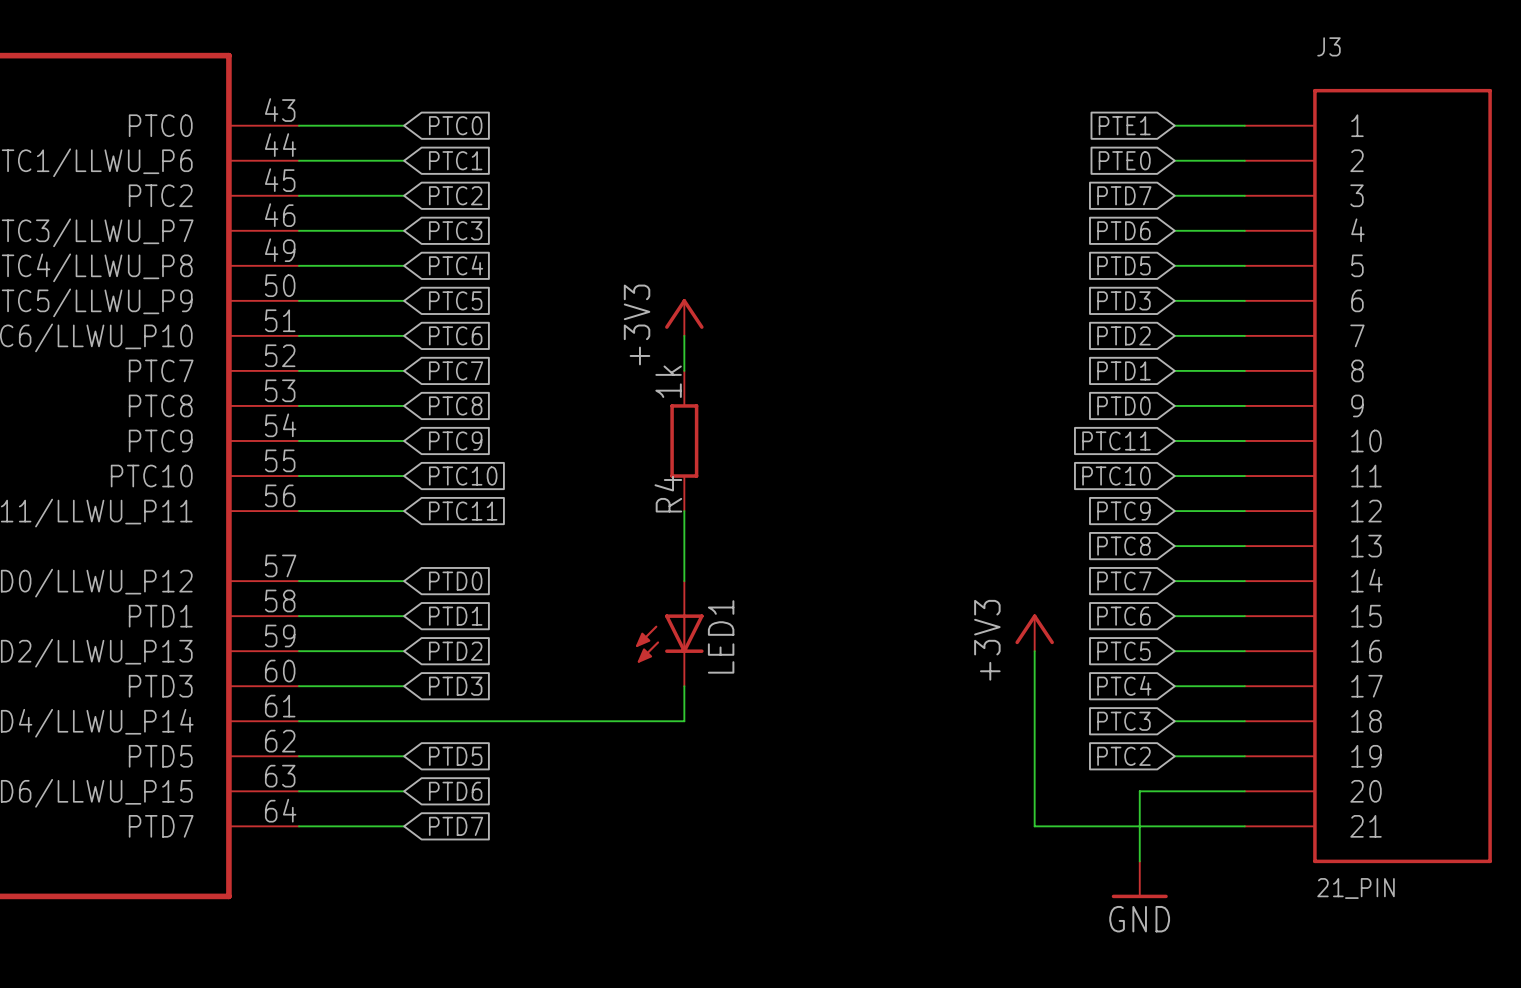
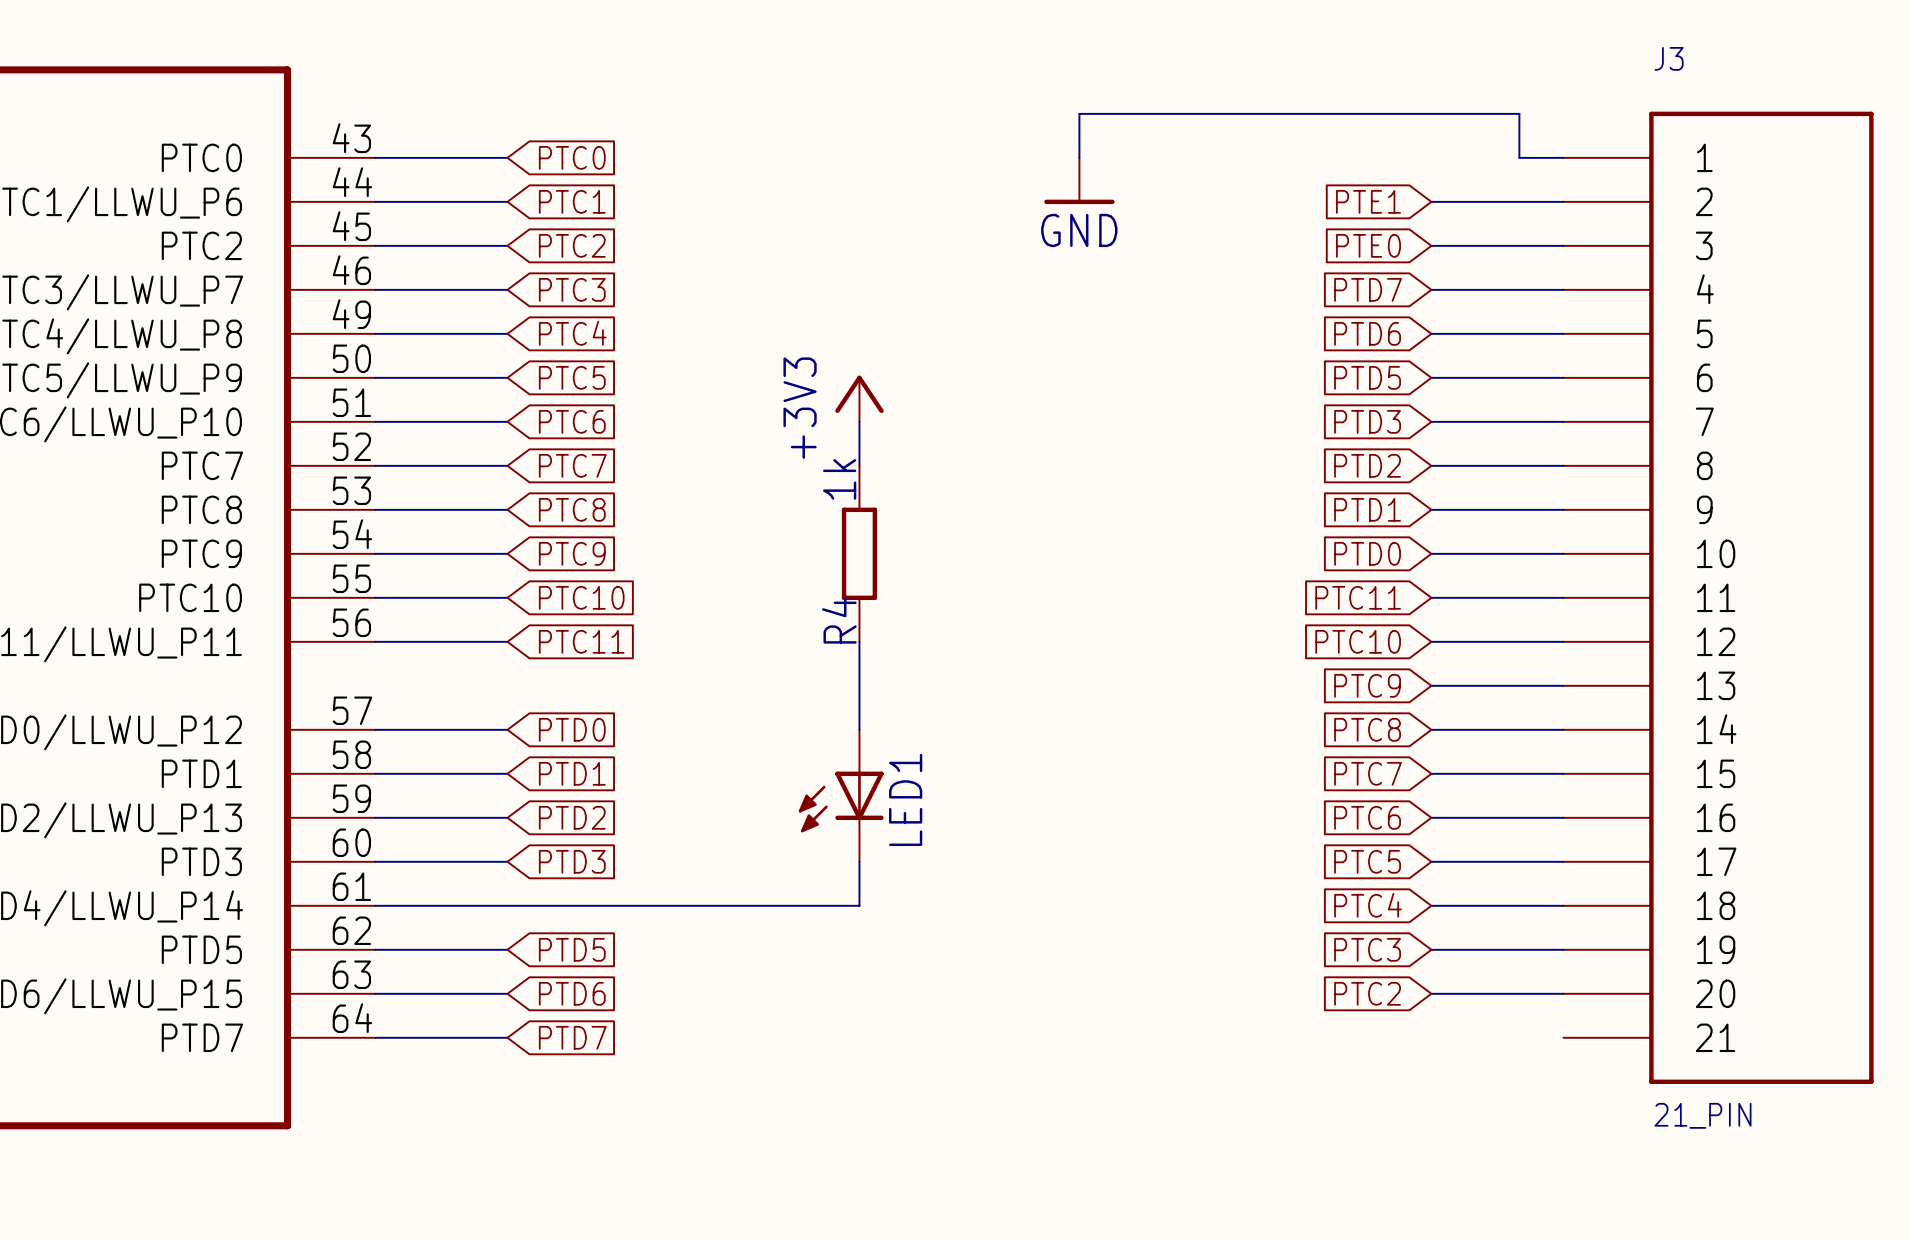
global label position: PTE1 (1124, 125) -> PTE1 (1368, 201)
wire: (1174, 125) (1209, 125) -> (1079, 157) (1079, 113) (1519, 113) (1519, 157)
power symbol: none -> GND (1079, 180)
global label position: PTE0 (1124, 160) -> PTE0 (1368, 245)
wire: none -> (1431, 201) (1475, 201)
global label position: PTD7 (1124, 195) -> PTD7 (1368, 289)
wire: none -> (1431, 245) (1475, 245)
global label position: PTD6 (1123, 230) -> PTD6 (1367, 333)
wire: none -> (1431, 289) (1475, 289)
global label position: PTD5 (1123, 265) -> PTD5 (1367, 377)
wire: none -> (1431, 333) (1475, 333)
global label position: PTD3 (1123, 300) -> PTD3 (1367, 421)
wire: none -> (1431, 377) (1475, 377)
global label position: PTD2 (1123, 335) -> PTD2 (1367, 465)
wire: none -> (1431, 421) (1475, 421)
global label position: PTD1 (1123, 370) -> PTD1 (1367, 509)
wire: none -> (1431, 465) (1475, 465)
global label position: PTD0 (1123, 405) -> PTD0 (1367, 553)
wire: none -> (1431, 509) (1475, 509)
global label position: PTC11 (1116, 440) -> PTC11 (1358, 597)
wire: none -> (1431, 553) (1475, 553)
global label position: PTC10 (1116, 476) -> PTC10 (1358, 641)
wire: none -> (1431, 597) (1475, 597)
global label position: PTC9 (1123, 511) -> PTC9 (1367, 685)
wire: none -> (1431, 641) (1475, 641)
global label position: PTC8 (1123, 546) -> PTC8 (1367, 729)
wire: none -> (1431, 685) (1475, 685)
global label position: PTC7 (1124, 581) -> PTC7 (1368, 773)
wire: none -> (1431, 729) (1475, 729)
global label position: PTC6 (1123, 616) -> PTC6 (1367, 817)
wire: none -> (1431, 773) (1475, 773)
power symbol: +3V3 (1034, 632) -> none
wire: (1034, 651) (1034, 826) (1244, 826) -> none
global label position: PTC5 (1123, 651) -> PTC5 (1367, 861)
wire: none -> (1431, 817) (1475, 817)
global label position: PTC4 (1124, 685) -> PTC4 (1368, 905)
wire: none -> (1431, 861) (1475, 861)
global label position: PTC3 (1123, 721) -> PTC3 (1367, 949)
wire: none -> (1431, 905) (1475, 905)
global label position: PTC2 (1123, 756) -> PTC2 (1367, 993)
wire: none -> (1431, 949) (1475, 949)
wire: (1139, 791) (1139, 861) -> none
power symbol: GND (1139, 879) -> none

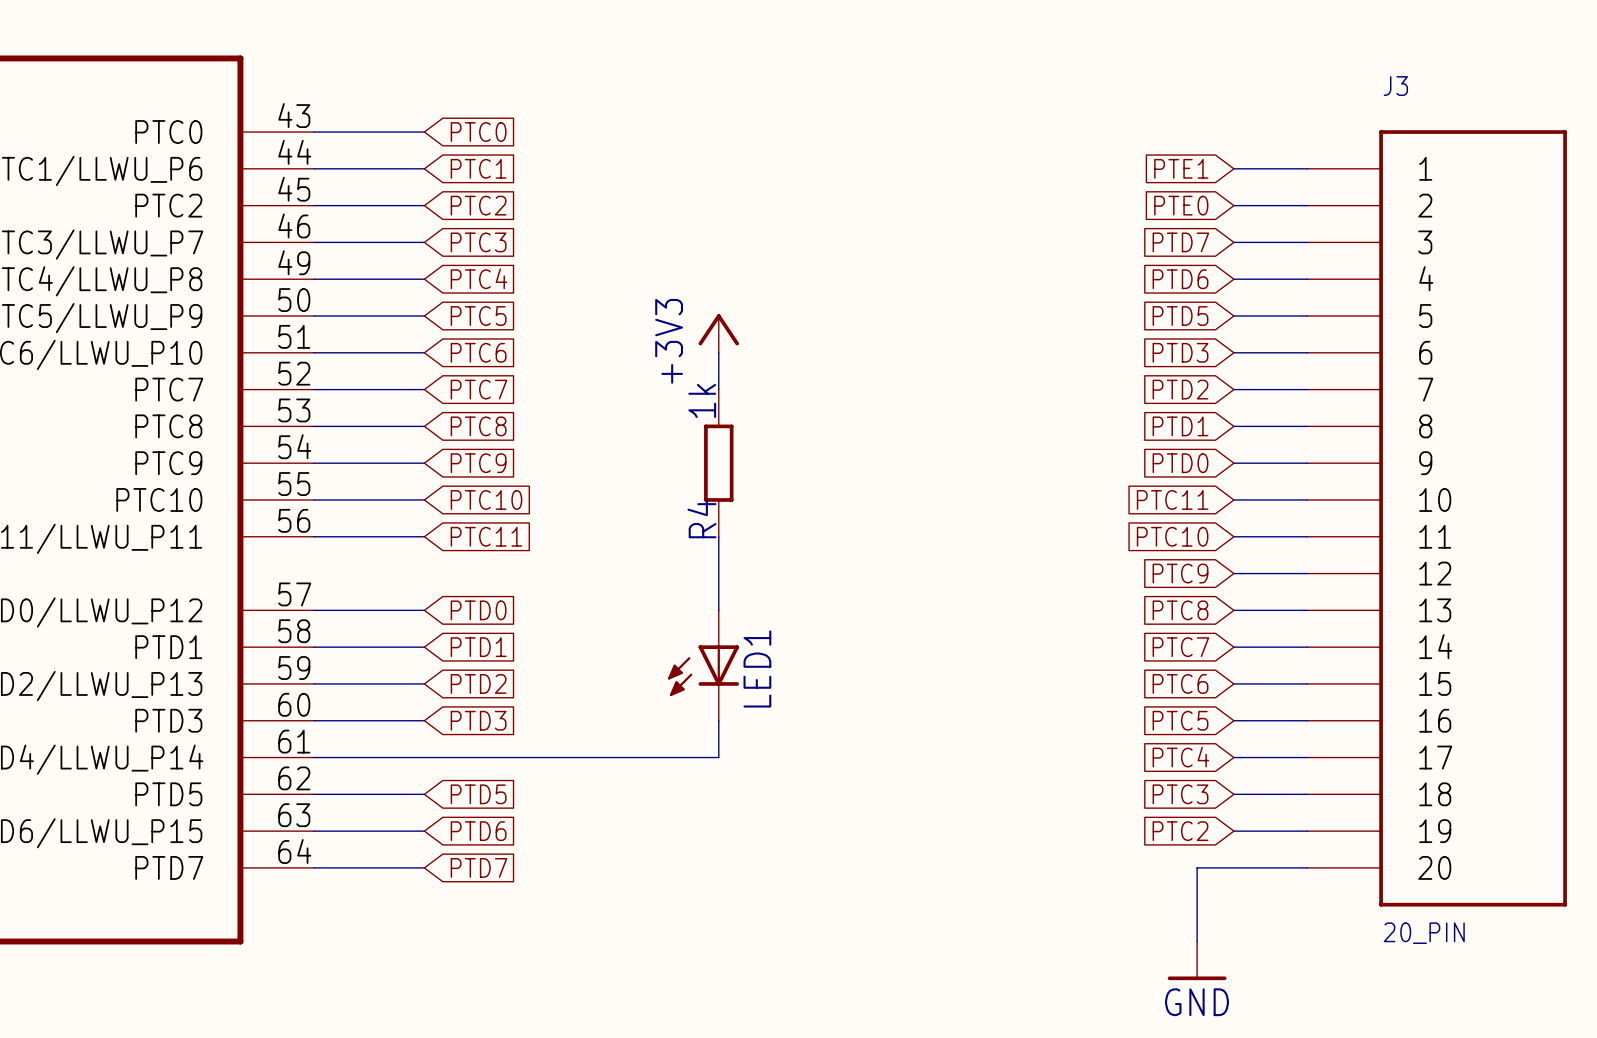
J3 symbol: [1563, 111, 1874, 1084] -> [1307, 130, 1567, 907]
wire: (1079, 157) (1079, 113) (1519, 113) (1519, 157) (1563, 157) -> none
power symbol: GND (1079, 180) -> none
global label position: PTE1 (1368, 201) -> PTE1 (1181, 168)
wire: (1431, 201) (1475, 201) -> none
global label position: PTE0 (1368, 245) -> PTE0 (1181, 205)
wire: (1431, 245) (1475, 245) -> none
global label position: PTD7 (1368, 289) -> PTD7 (1180, 242)
wire: (1431, 289) (1475, 289) -> none
global label position: PTD6 (1367, 333) -> PTD6 (1180, 279)
wire: (1431, 333) (1475, 333) -> none
global label position: PTD5 (1367, 377) -> PTD5 (1180, 316)
wire: (1431, 377) (1475, 377) -> none
global label position: PTD3 (1367, 421) -> PTD3 (1180, 352)
wire: (1431, 421) (1475, 421) -> none
global label position: PTD2 (1367, 465) -> PTD2 (1180, 389)
wire: (1431, 465) (1475, 465) -> none
global label position: PTD1 (1367, 509) -> PTD1 (1180, 426)
wire: (1431, 509) (1475, 509) -> none
global label position: PTD0 (1367, 553) -> PTD0 (1180, 463)
wire: (1431, 553) (1475, 553) -> none
global label position: PTC11 (1358, 597) -> PTC11 (1172, 499)
wire: (1431, 597) (1475, 597) -> none
global label position: PTC10 (1358, 641) -> PTC10 (1172, 536)
wire: (1431, 641) (1475, 641) -> none
global label position: PTC9 (1367, 685) -> PTC9 (1180, 573)
wire: (1431, 685) (1475, 685) -> none
global label position: PTC8 (1367, 729) -> PTC8 (1180, 610)
wire: (1431, 729) (1475, 729) -> none
global label position: PTC7 (1368, 773) -> PTC7 (1180, 647)
wire: (1431, 773) (1475, 773) -> none
global label position: PTC6 (1367, 817) -> PTC6 (1180, 683)
wire: (1431, 817) (1475, 817) -> none
global label position: PTC5 (1367, 861) -> PTC5 (1180, 720)
wire: (1431, 861) (1475, 861) -> none
global label position: PTC4 (1368, 905) -> PTC4 (1180, 757)
wire: (1431, 905) (1475, 905) -> none
global label position: PTC3 (1367, 949) -> PTC3 (1180, 794)
wire: (1431, 949) (1475, 949) -> none
global label position: PTC2 (1367, 993) -> PTC2 (1180, 831)
wire: (1431, 993) (1475, 993) -> none
wire: none -> (1307, 867) (1197, 867) (1197, 941)
J3 value: 21_PIN (1702, 1115) -> 20_PIN (1424, 933)
power symbol: none -> GND (1197, 960)

